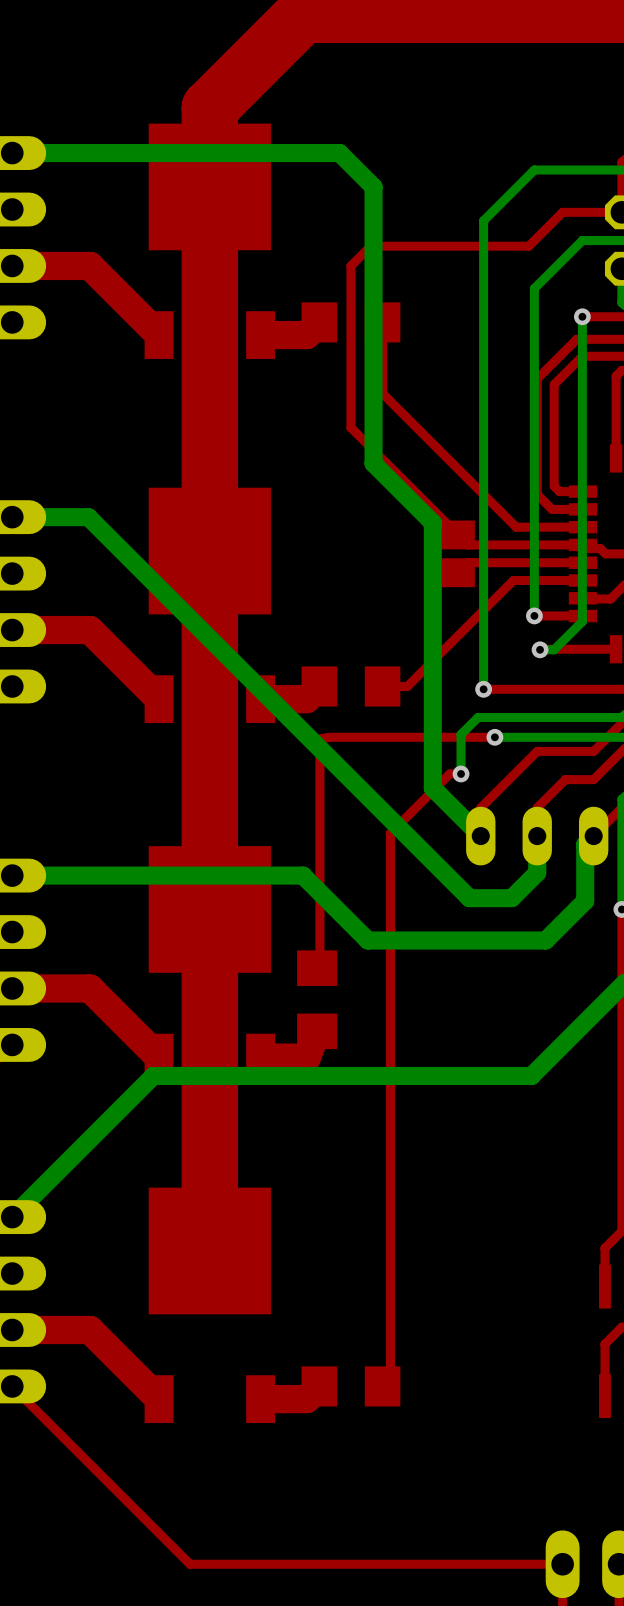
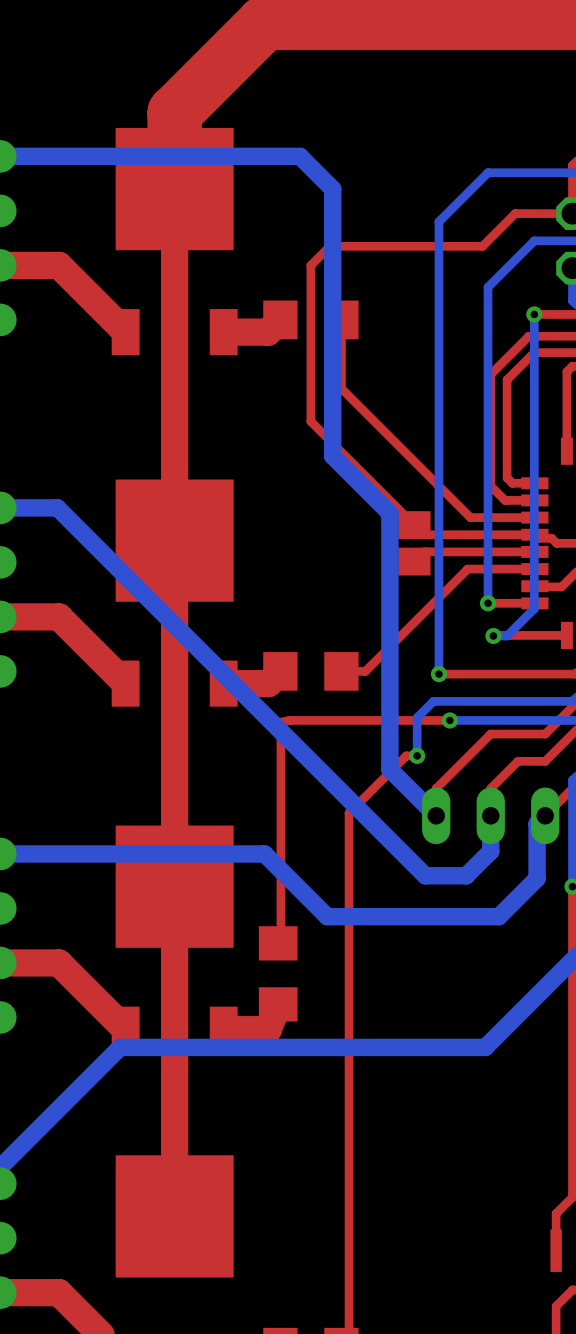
top track width: thick (209, 186) (209, 909) -> thin (174, 189) (174, 886)
top track width: thick (209, 932) (209, 1250) -> thin (174, 908) (174, 1216)

